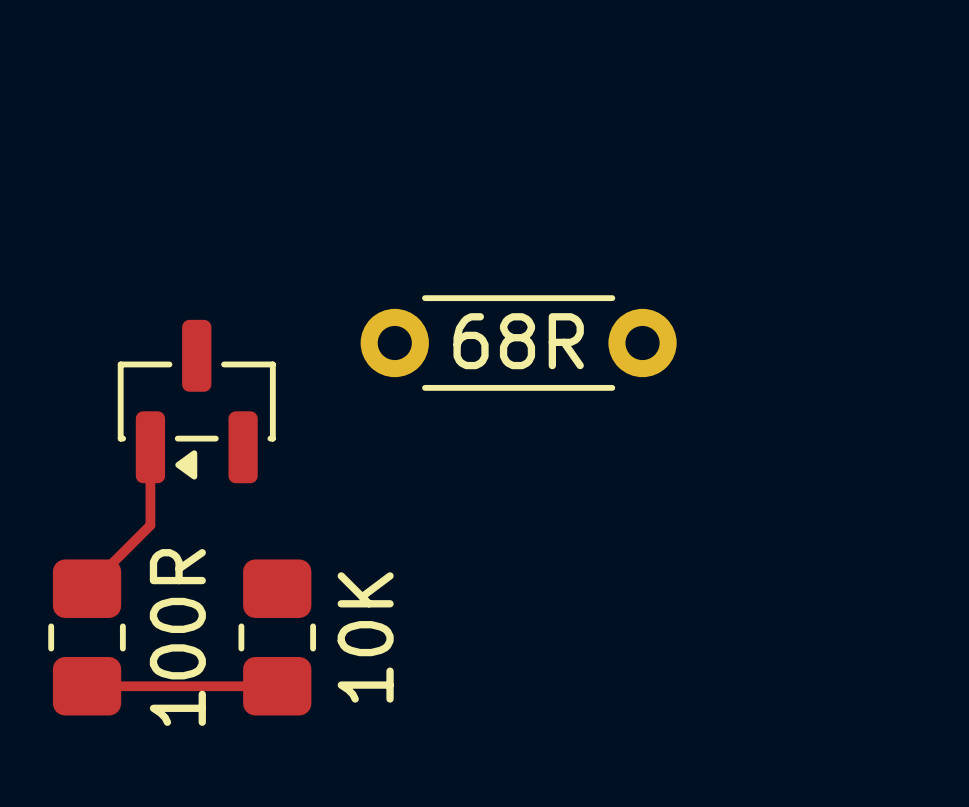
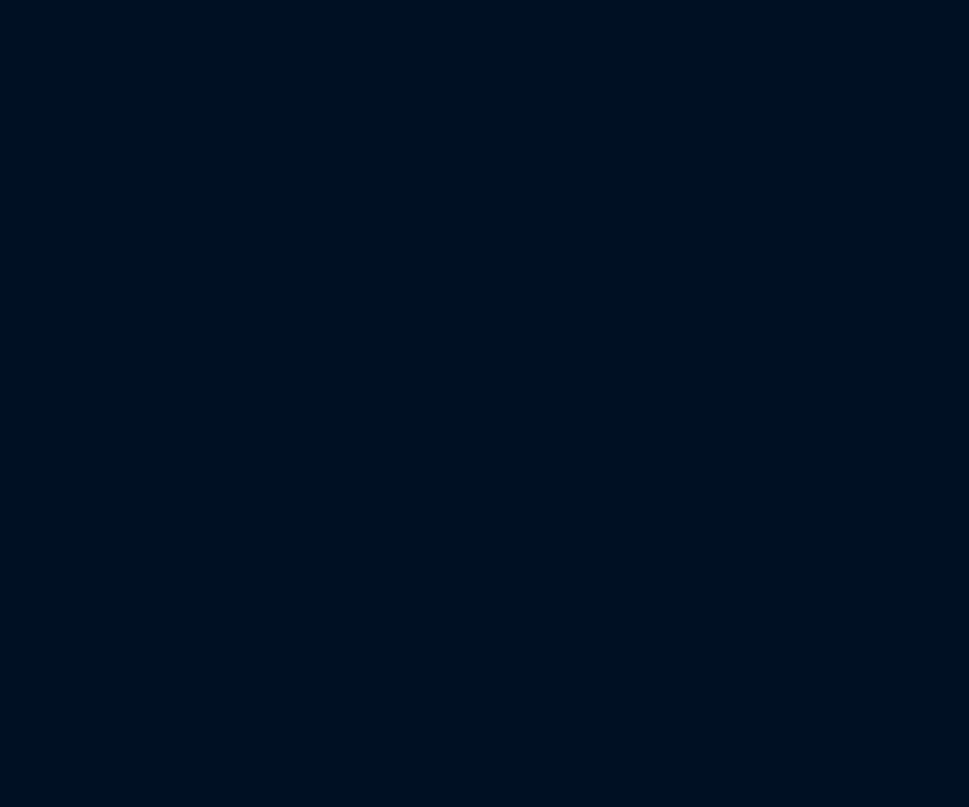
part: 68R (518, 343) -> none
part: (196, 401) -> none
top track: (150, 447) (150, 525) (87, 588) -> none
part: 100R (87, 637) -> none
part: 10K (277, 637) -> none
top track: (87, 686) (277, 686) -> none

